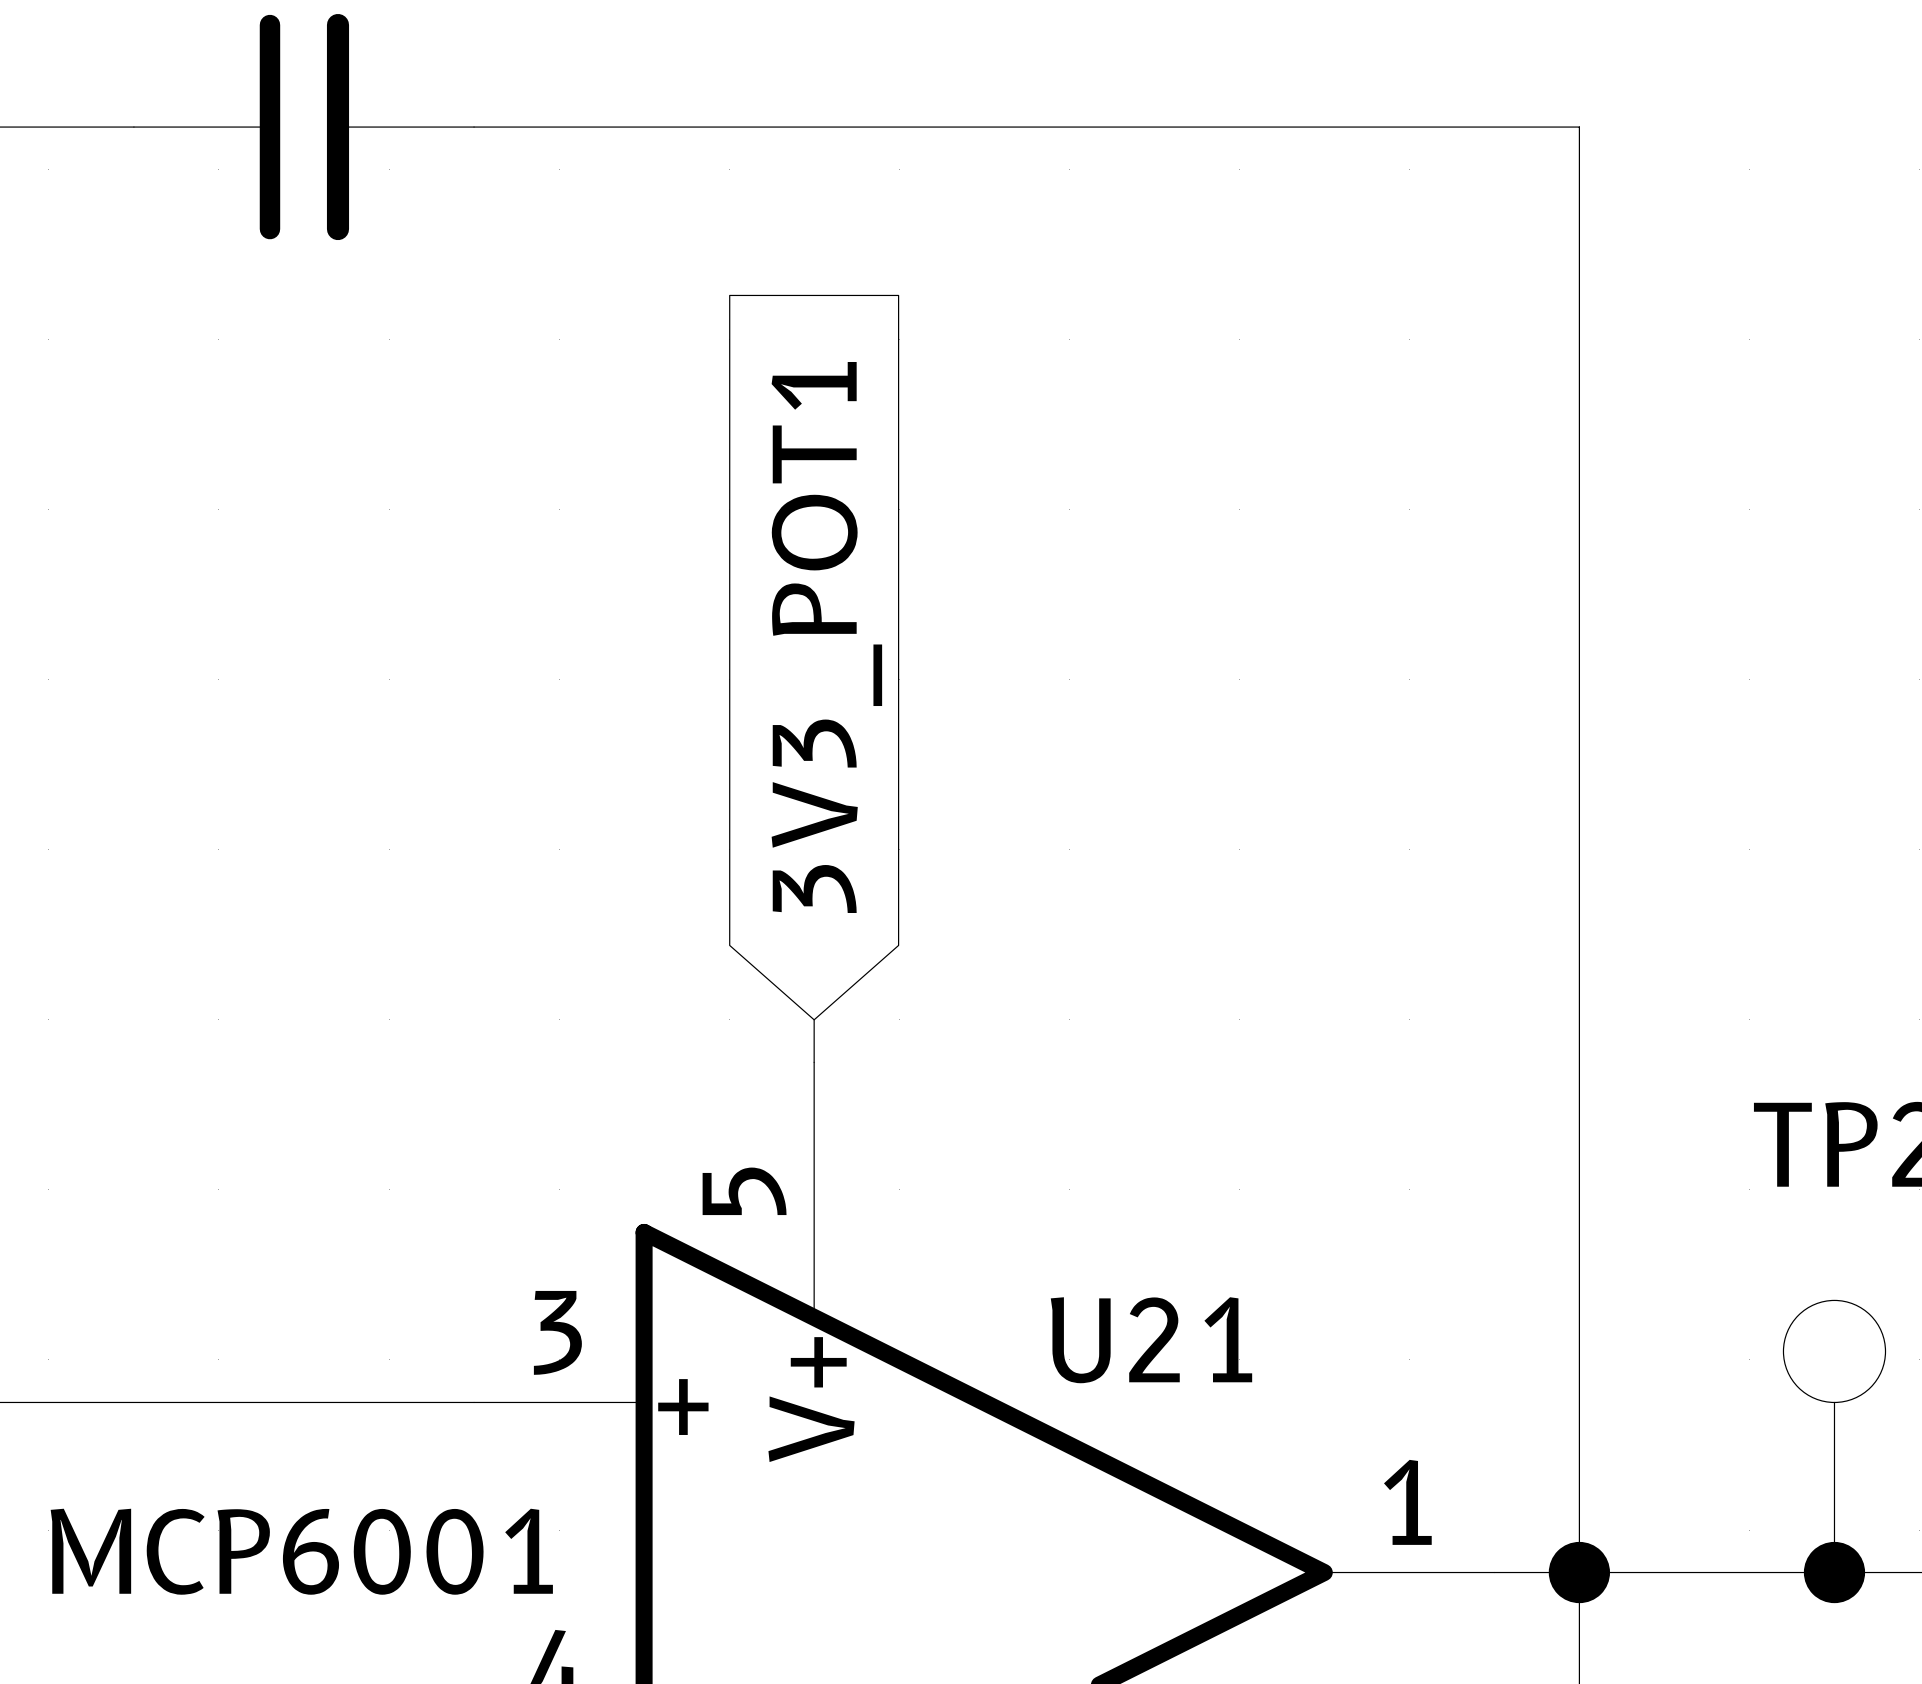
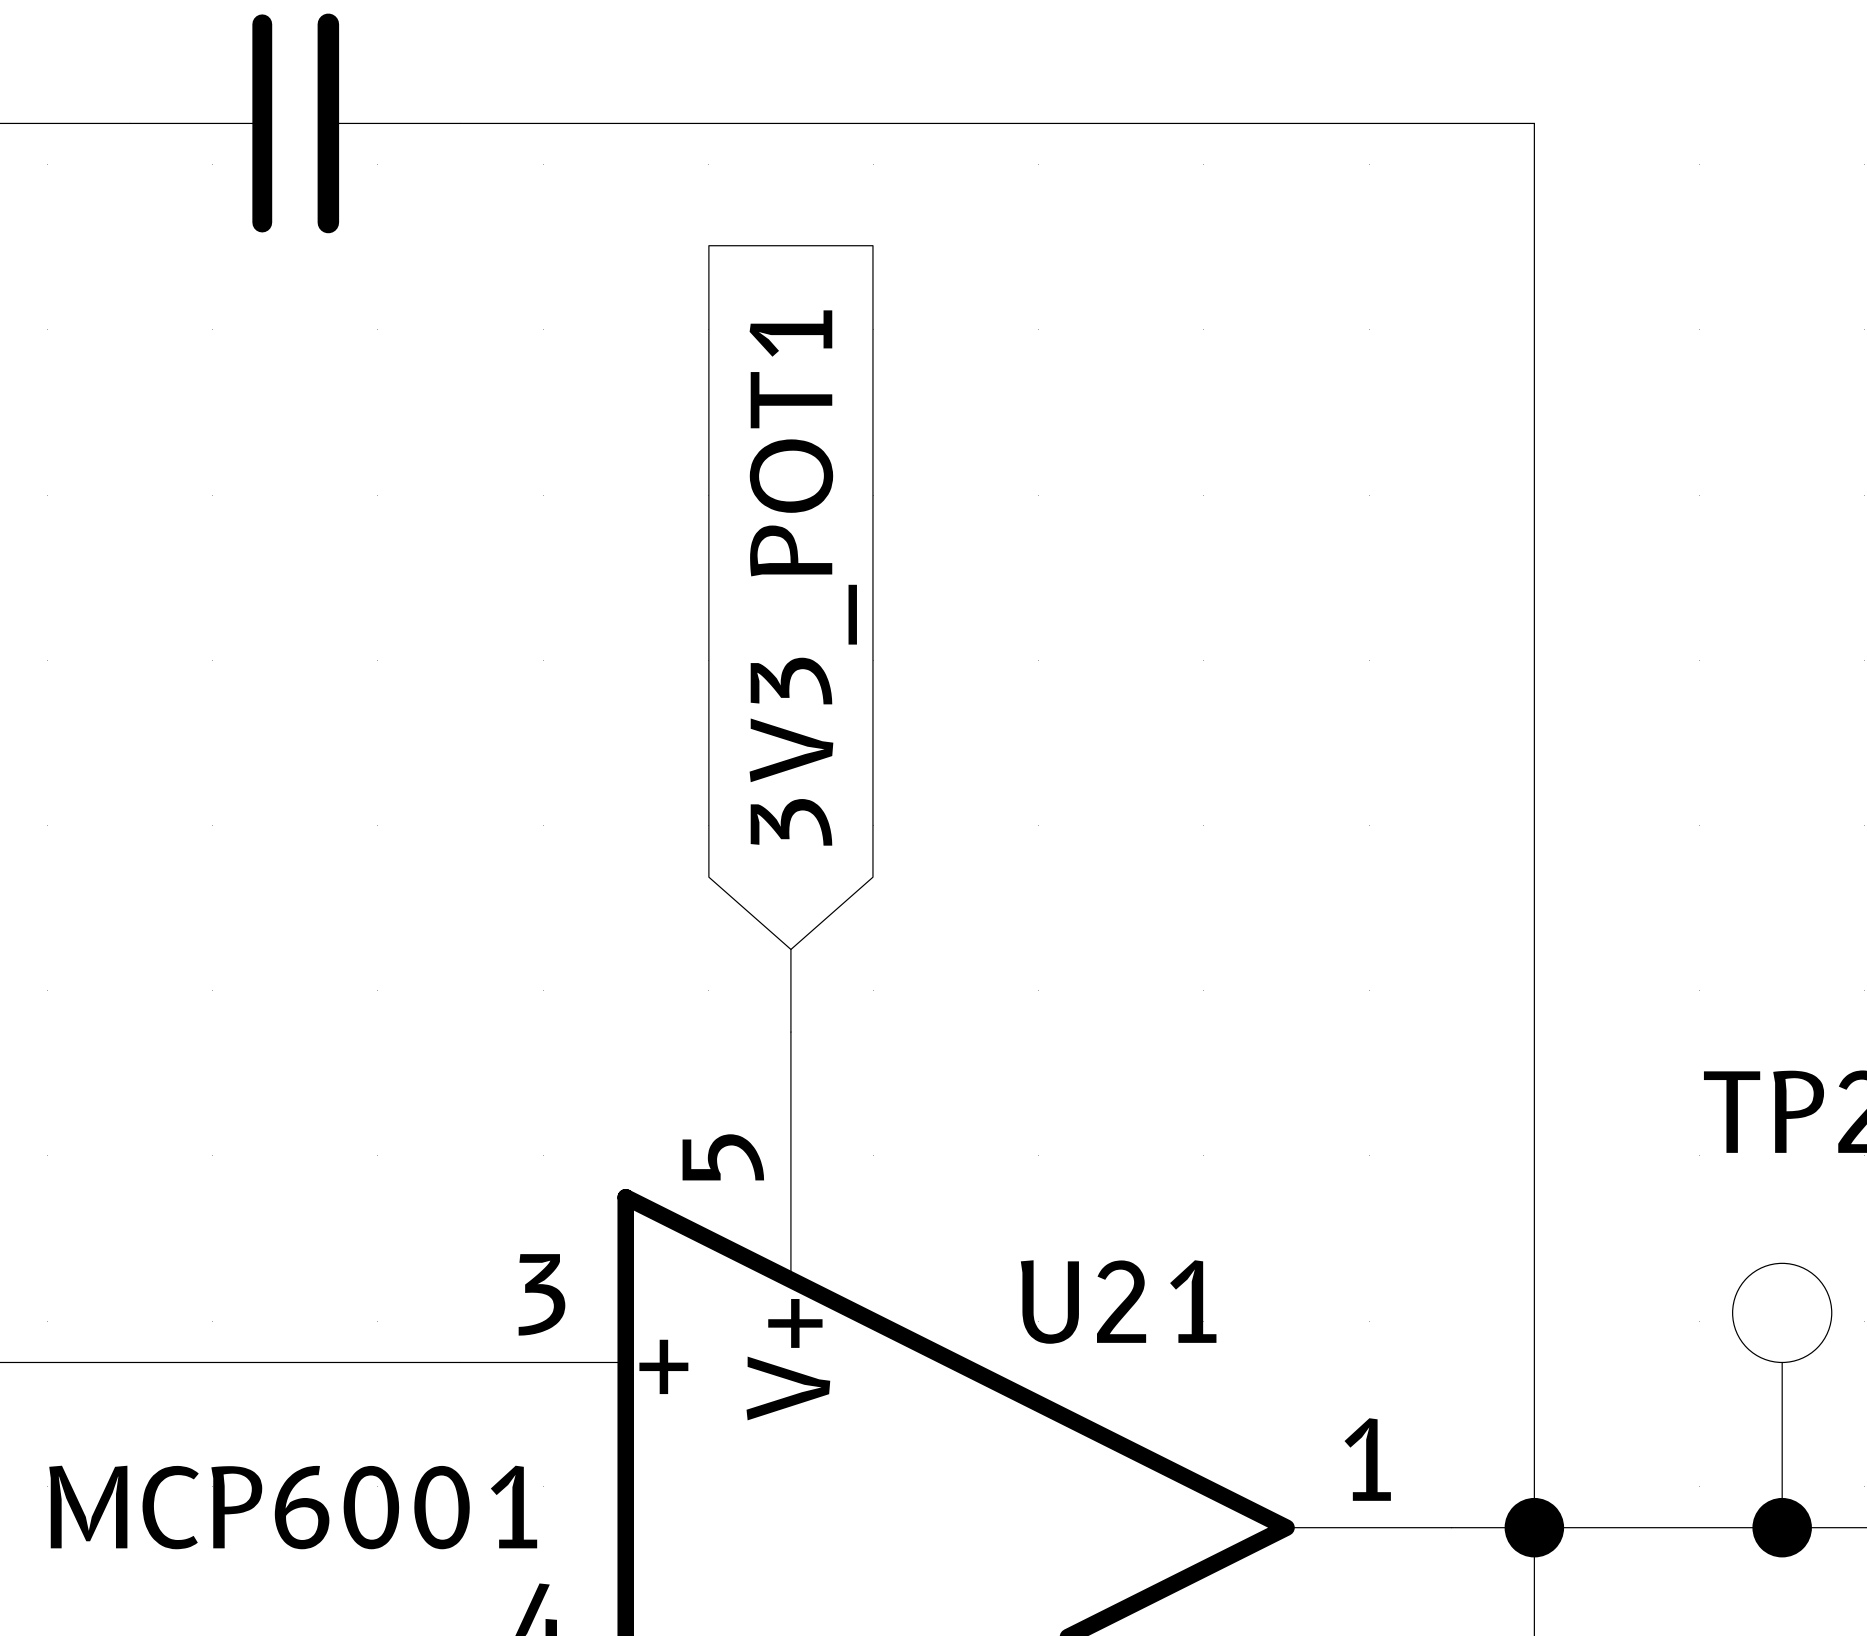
global label position: 3V3_POT1 (826, 637) -> 3V3_POT1 (803, 578)
wire: none -> (790, 949) (790, 990)

